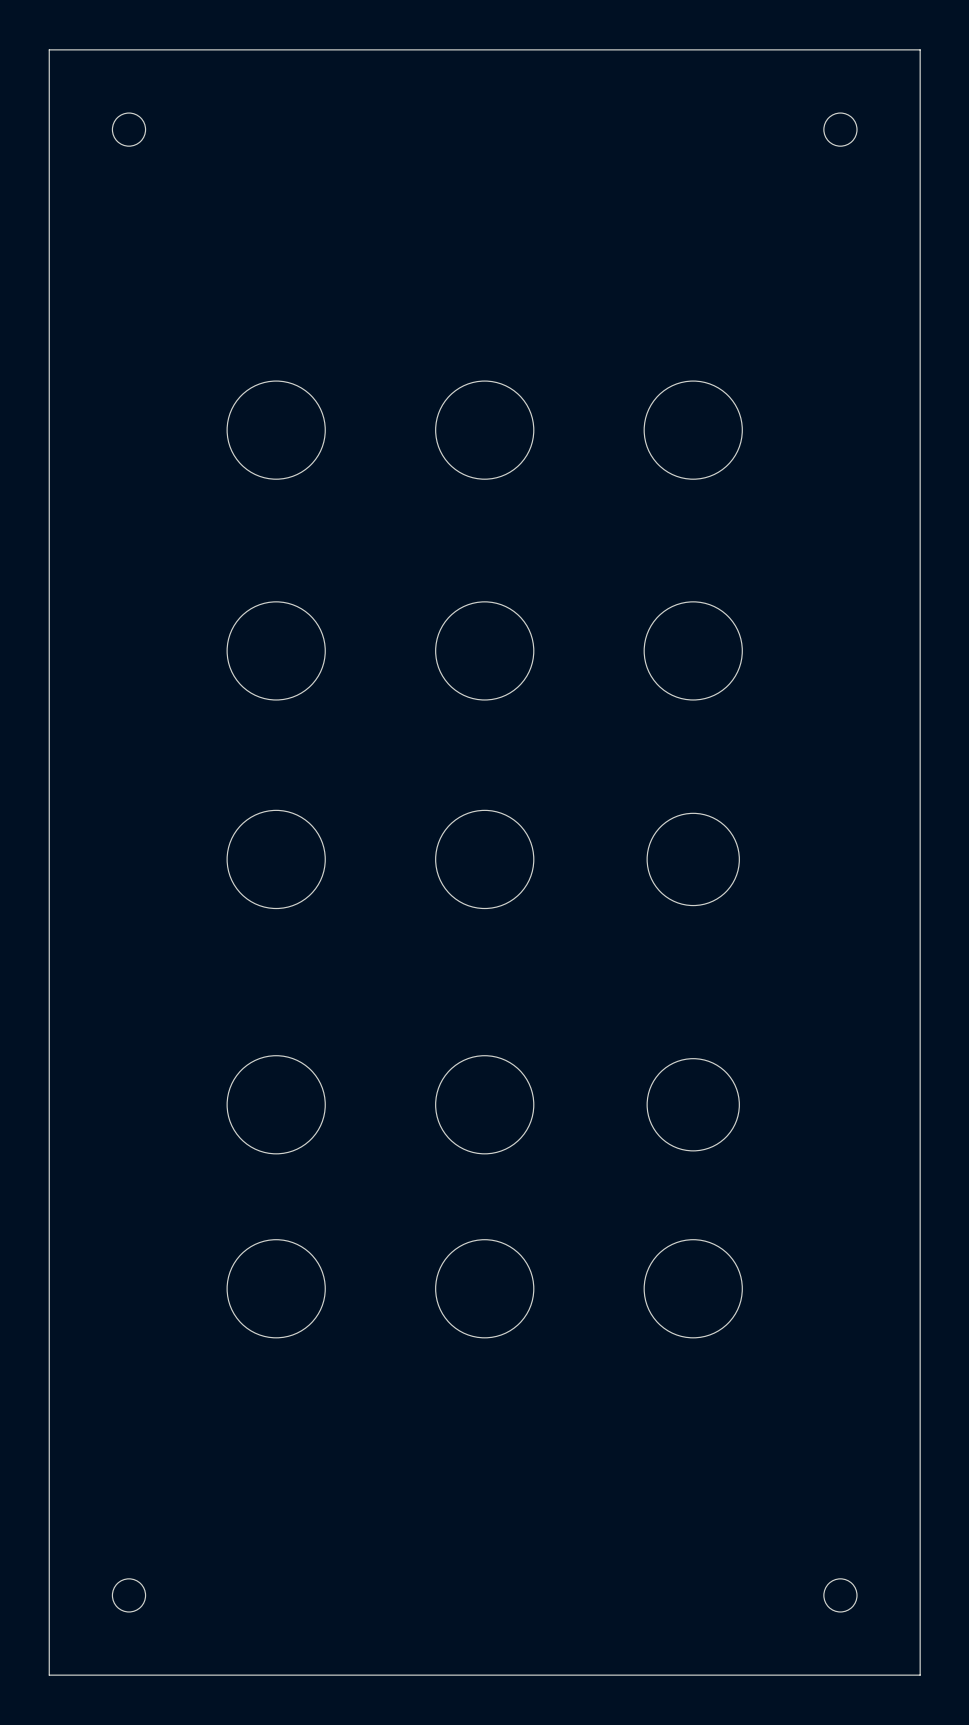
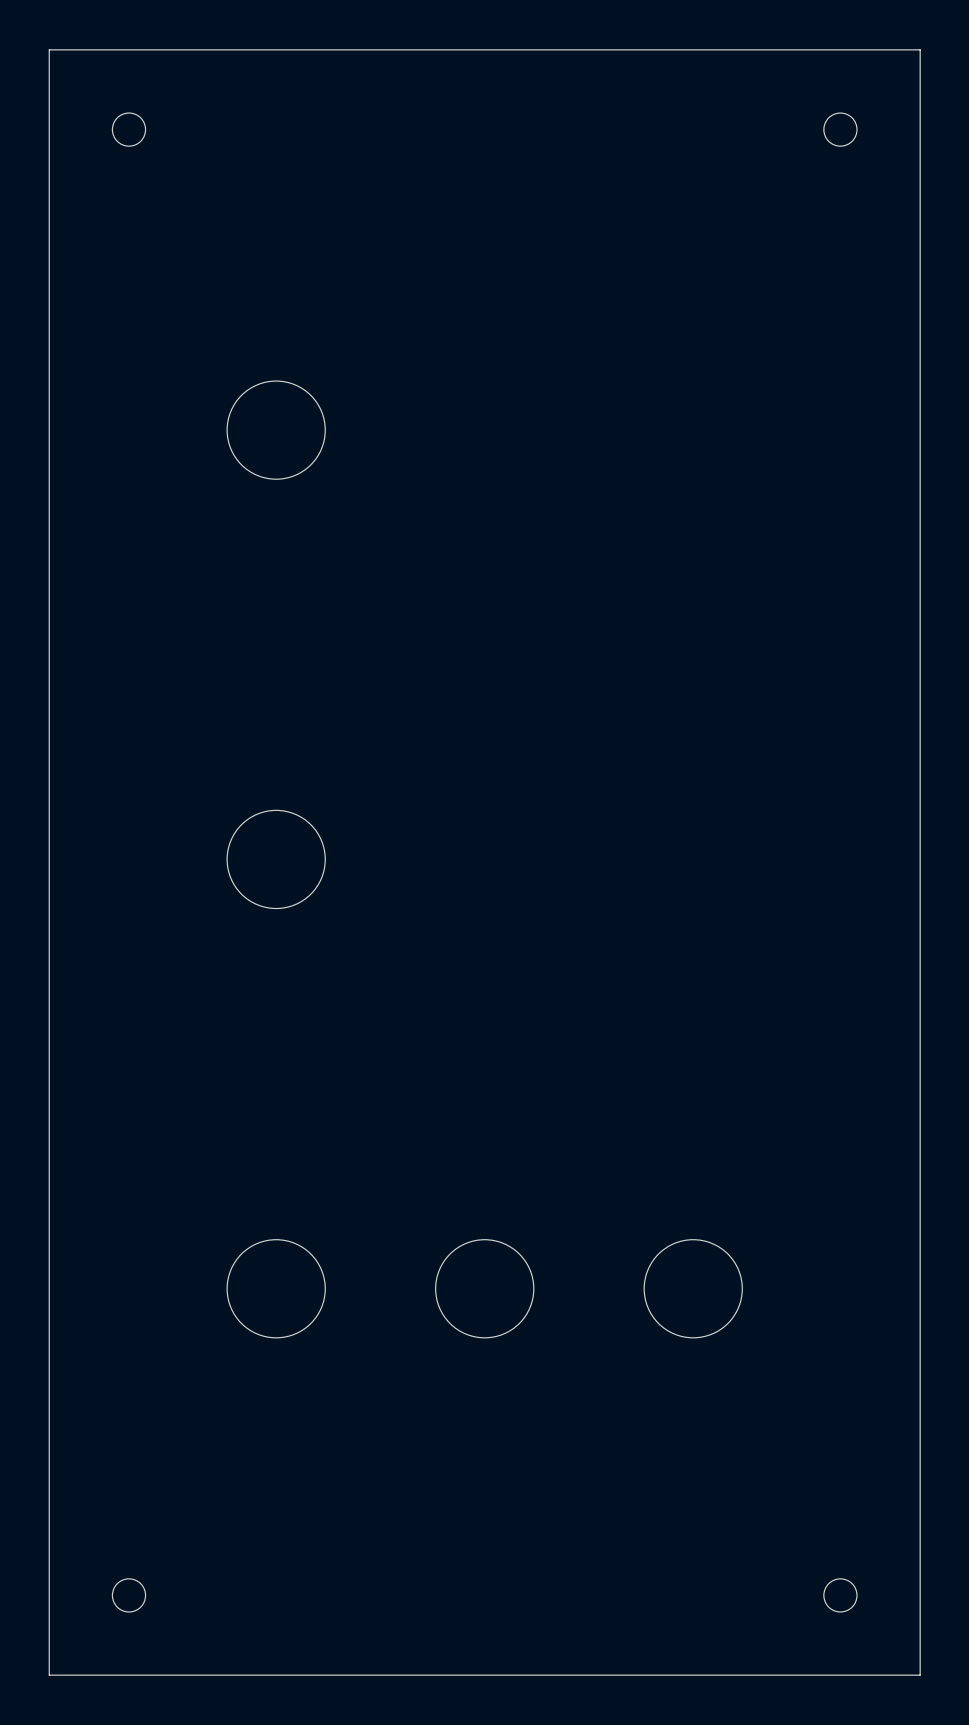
round board edge: [435, 380, 535, 480] -> none
round board edge: [643, 380, 743, 480] -> none
round board edge: [226, 601, 326, 701] -> none
round board edge: [435, 601, 535, 701] -> none
round board edge: [643, 601, 743, 701] -> none
round board edge: [435, 810, 535, 909] -> none
round board edge: [646, 813, 740, 906] -> none
round board edge: [226, 1055, 326, 1155] -> none
round board edge: [435, 1055, 535, 1155] -> none
round board edge: [646, 1058, 740, 1152] -> none

